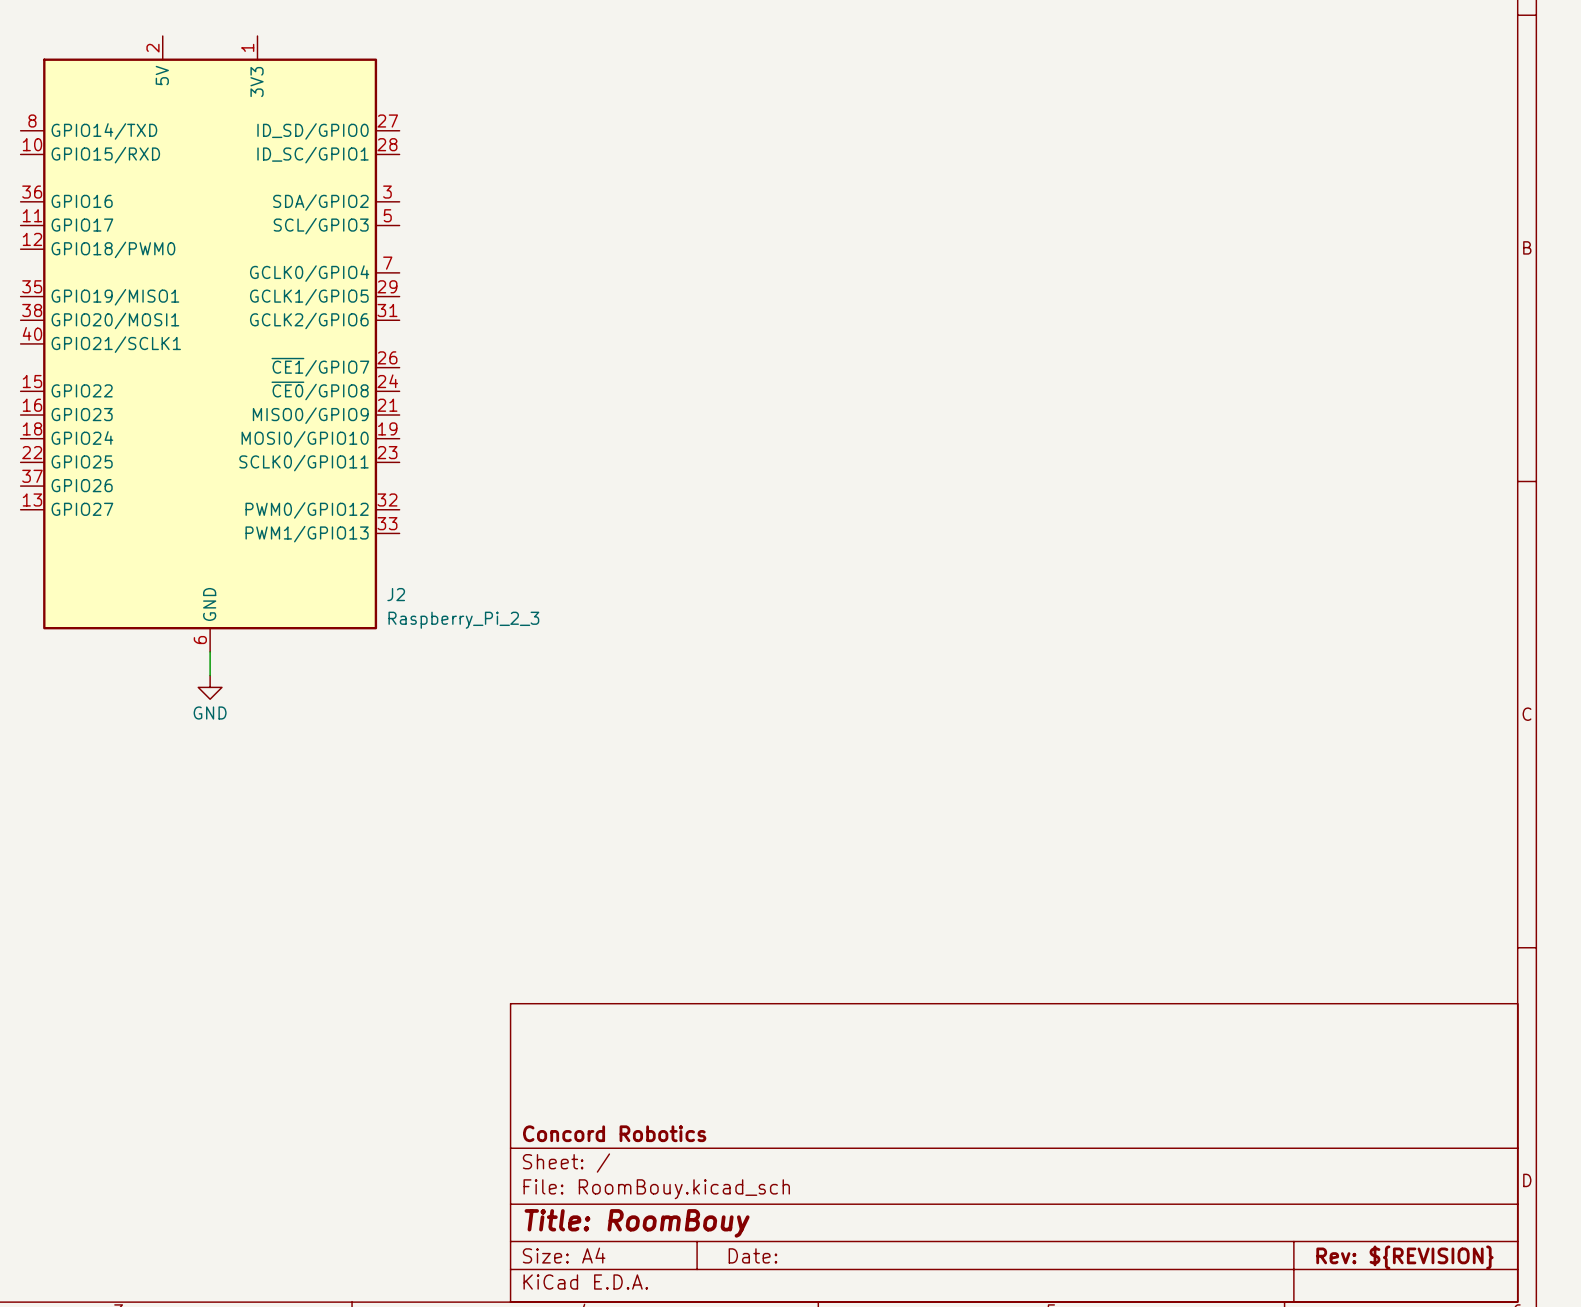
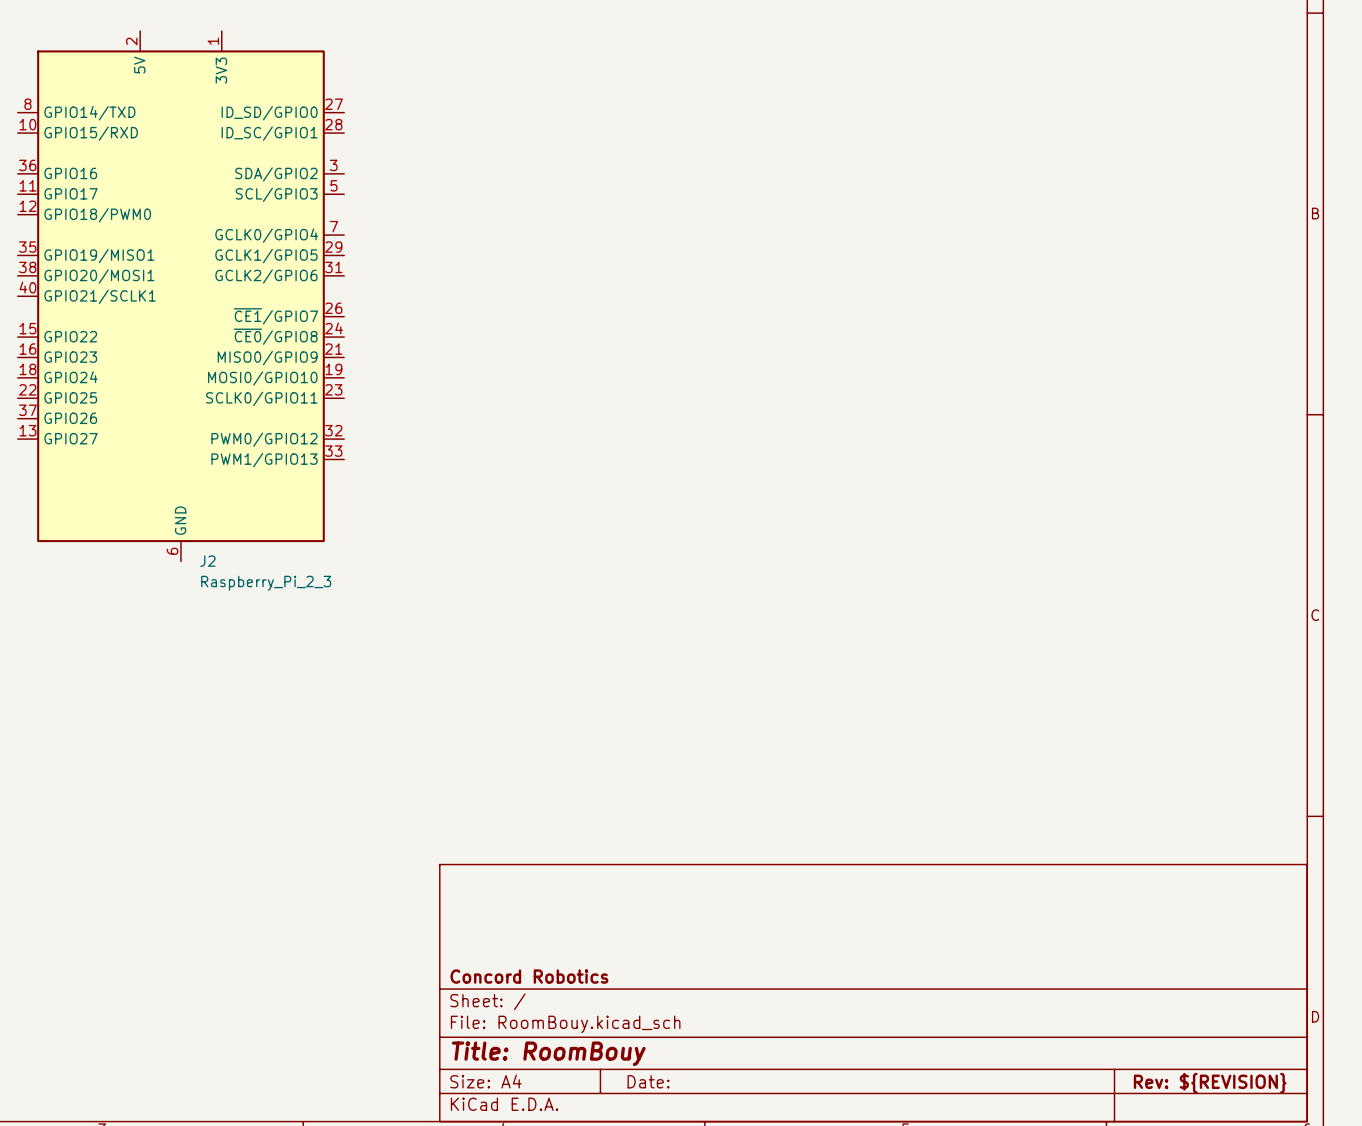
J2 name position: J2 (396, 594) -> J2 (207, 561)
J2 value position: Raspberry_Pi_2_3 (463, 620) -> Raspberry_Pi_2_3 (266, 583)
wire: (210, 651) (210, 675) -> none
power symbol: GND (210, 687) -> none

